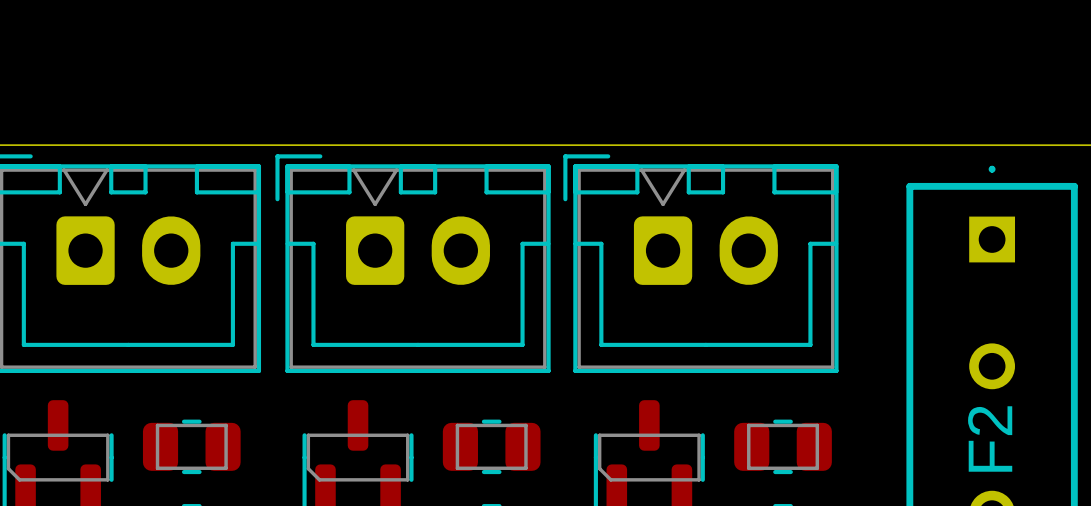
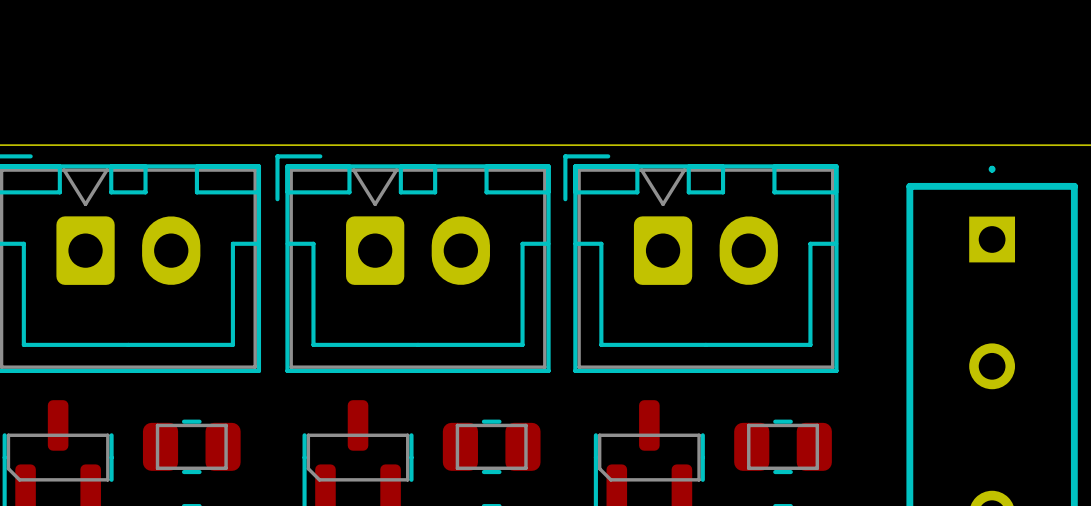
F2 name: F2 (990, 438) -> none

